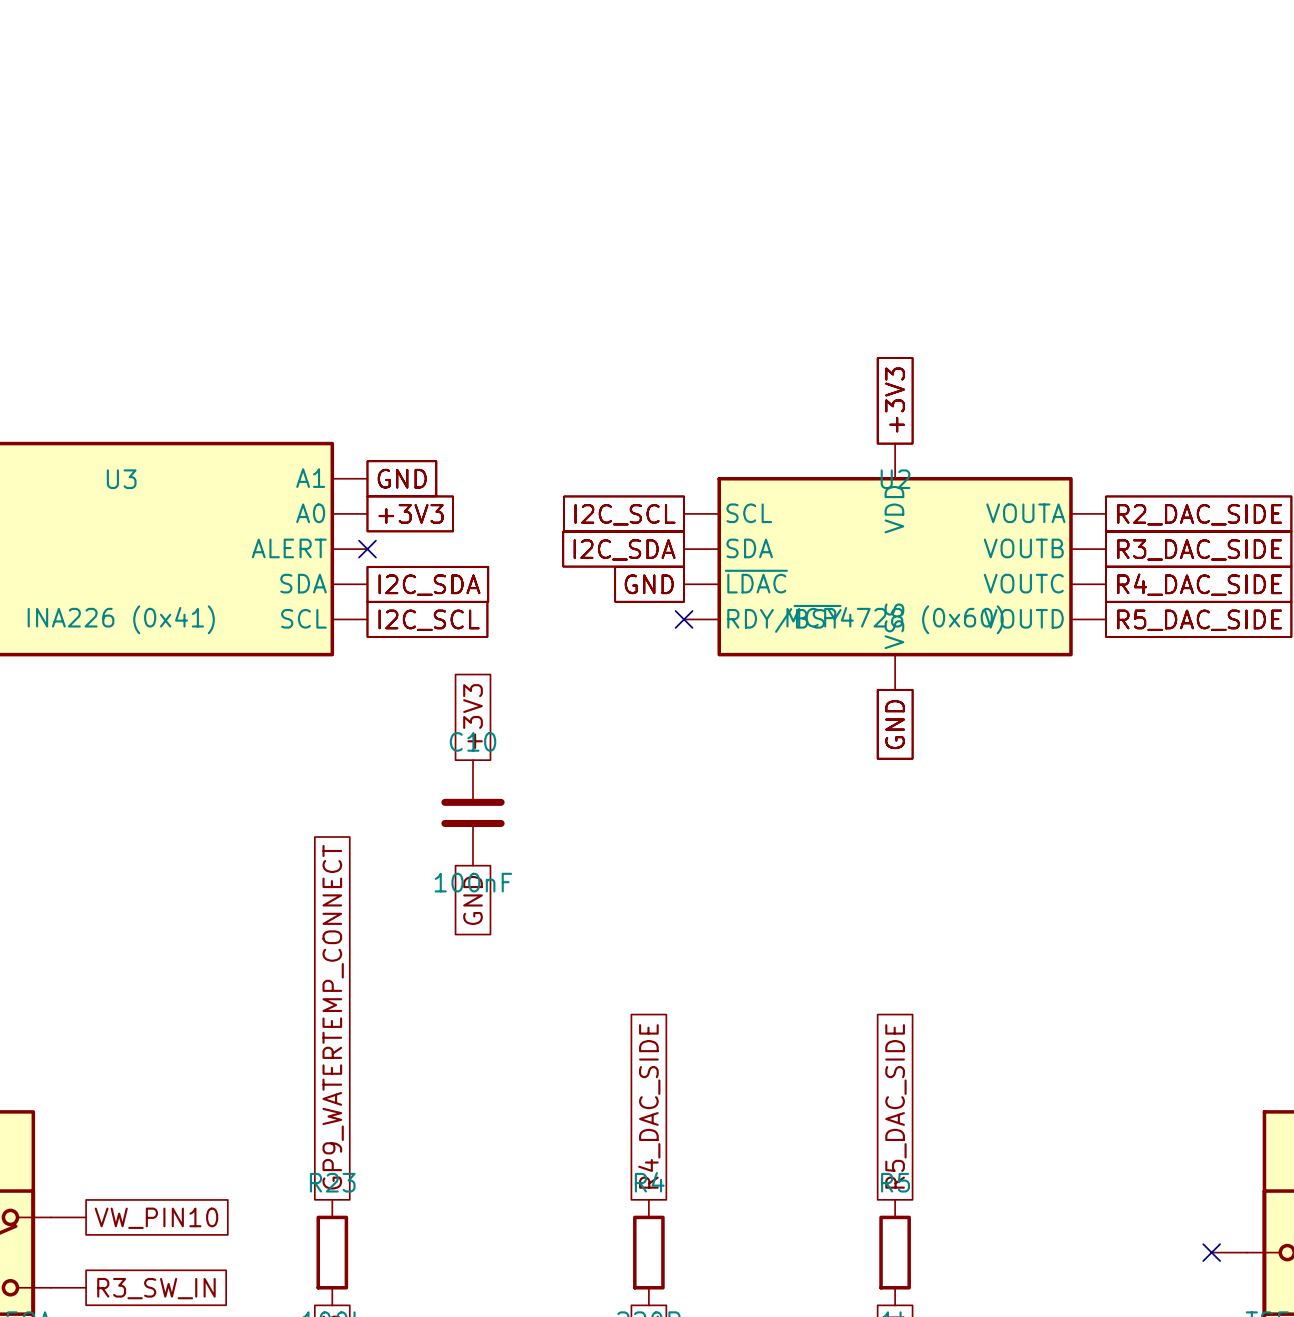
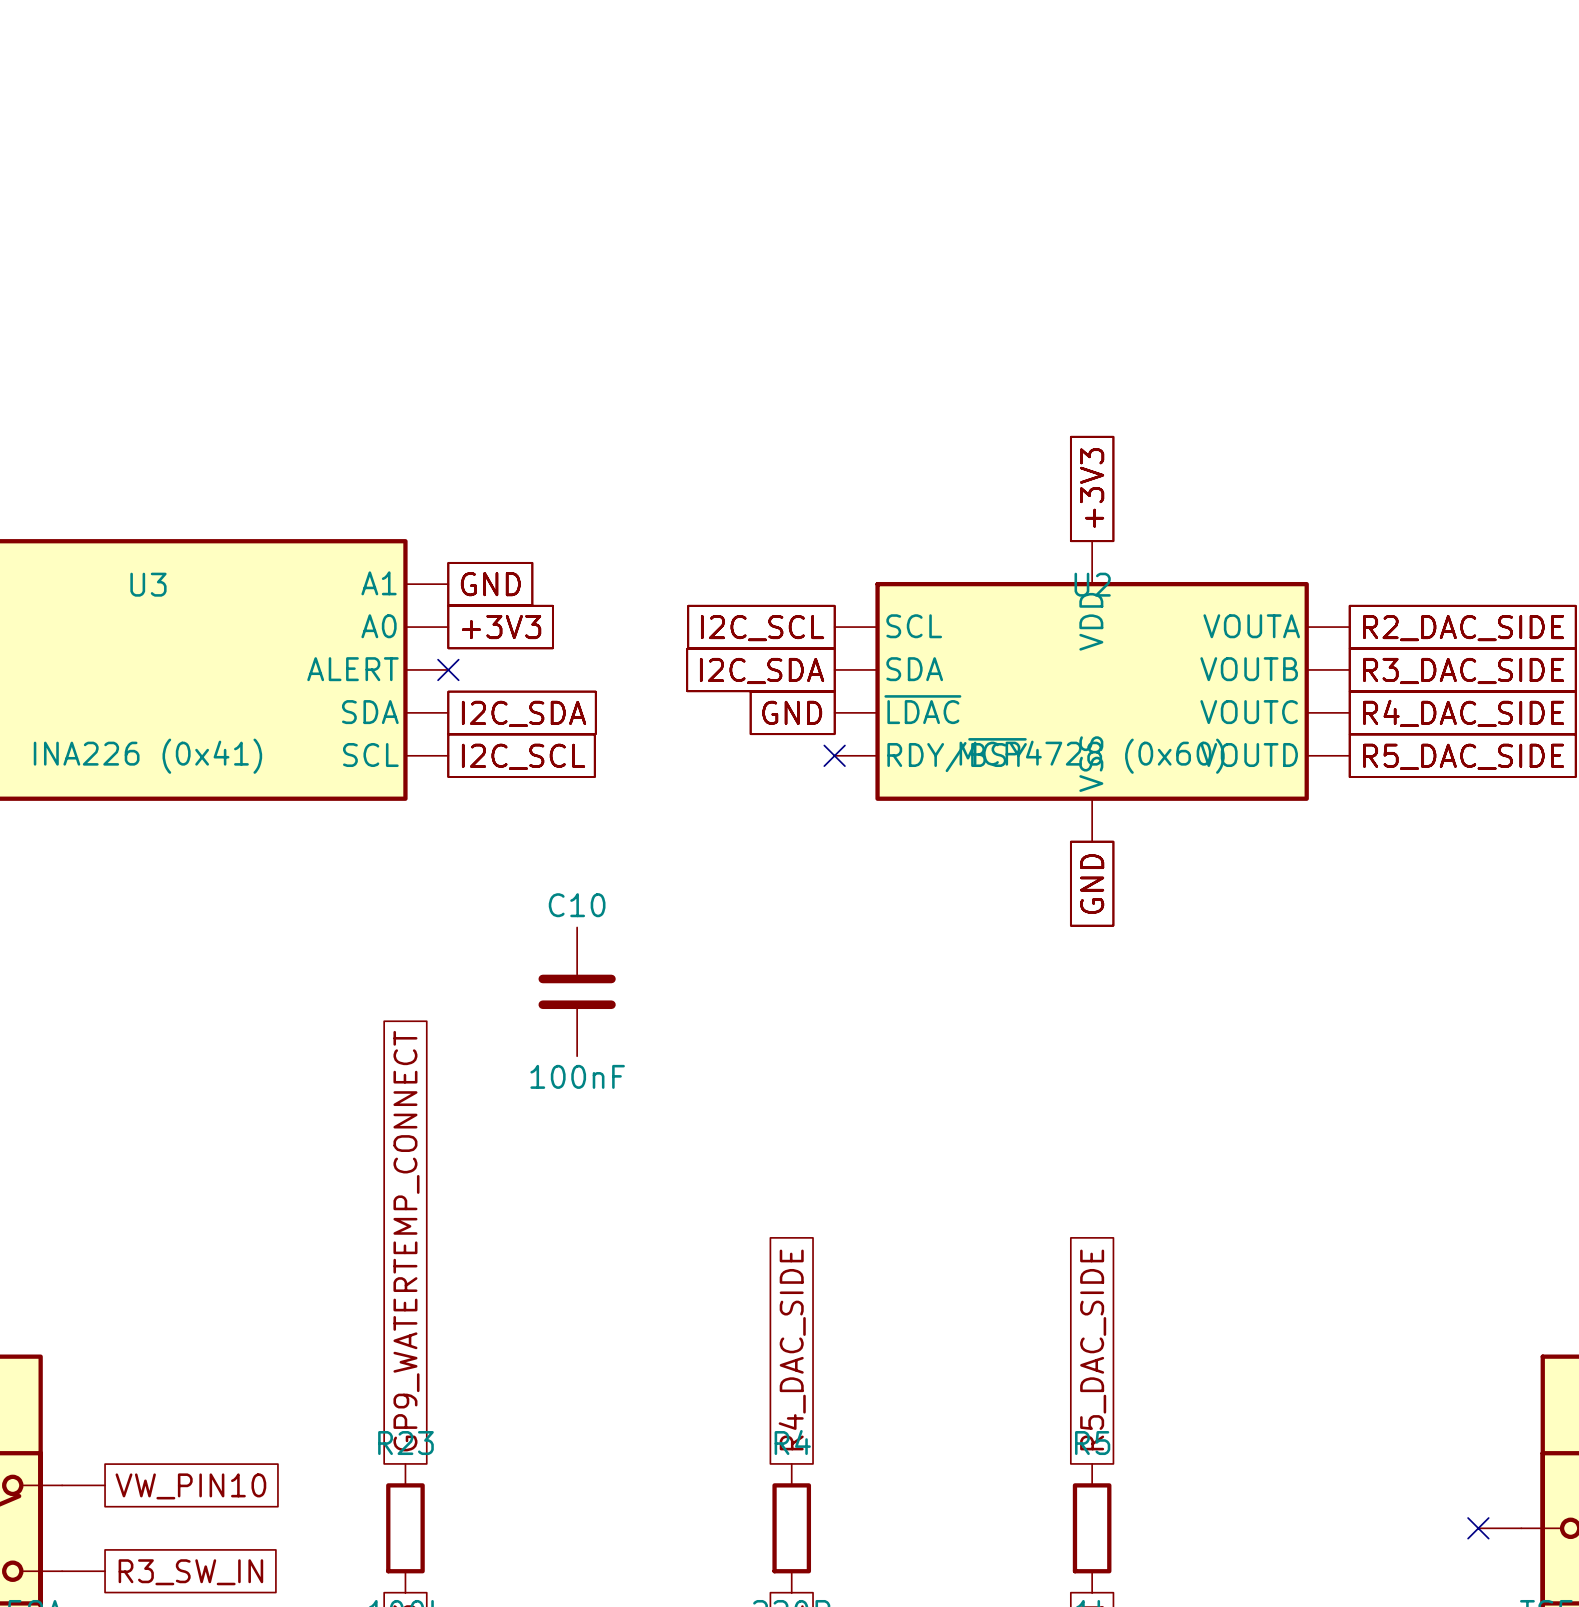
global label: +3V3 (473, 716) -> none
global label: GND (473, 900) -> none

